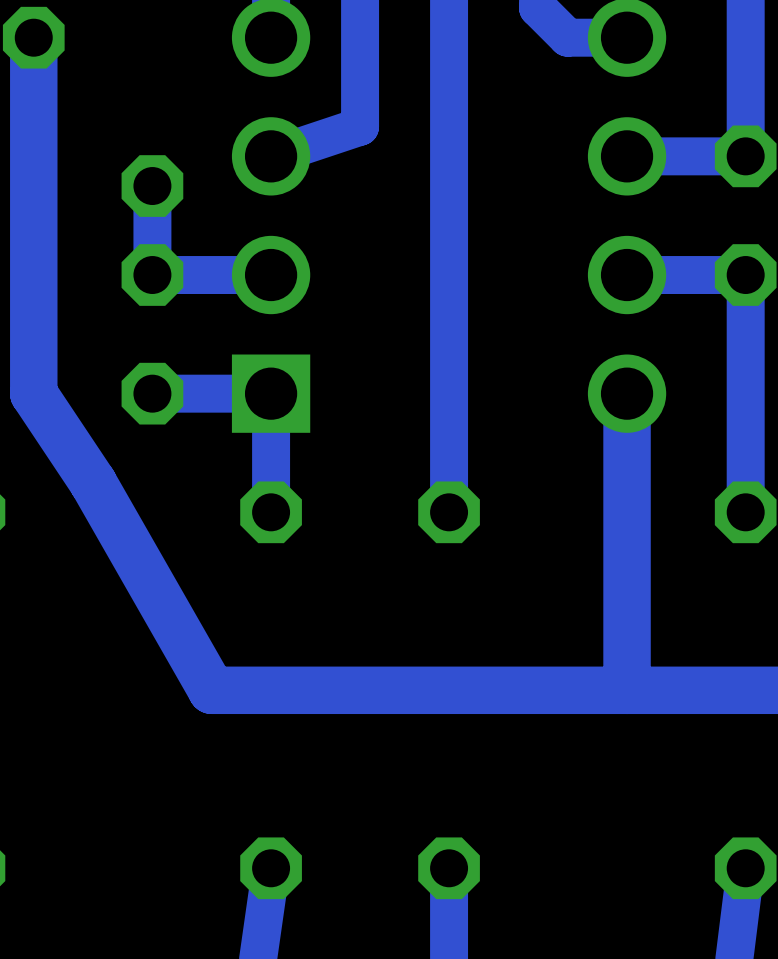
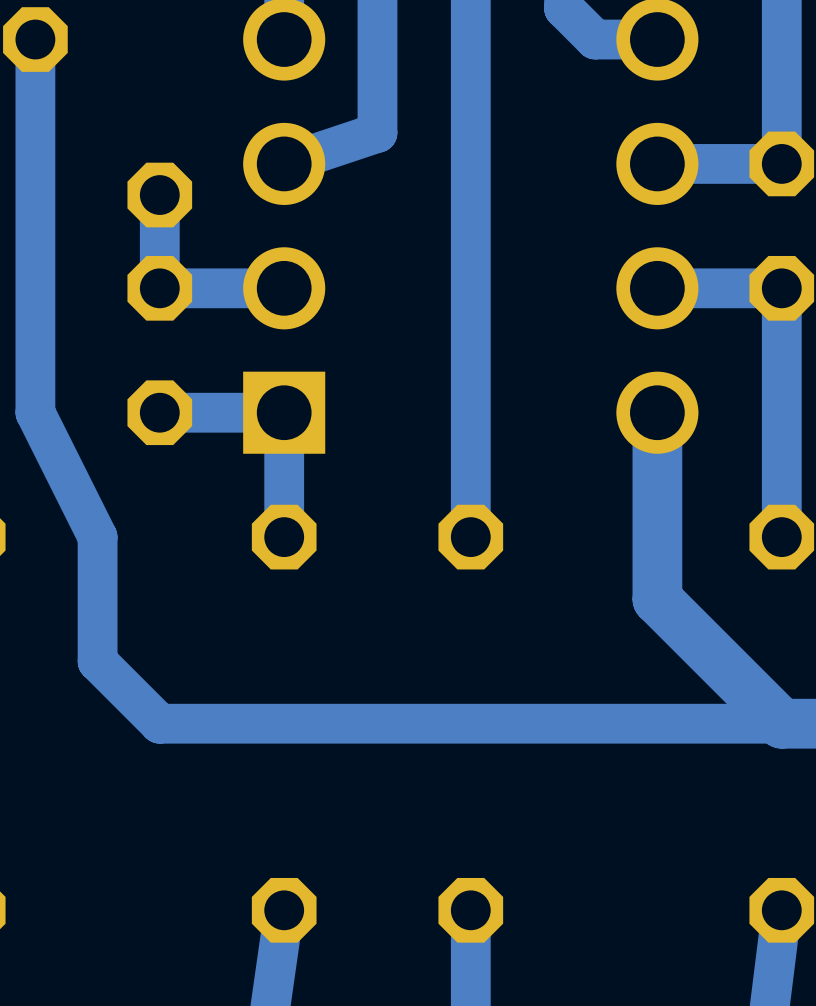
bottom track width: thick (33, 37) (33, 393) -> thin (35, 39) (35, 412)
bottom track: (33, 393) (93, 482) (211, 690) -> (35, 412) (97, 537) (97, 661) (159, 723) (222, 723)
bottom track: (627, 571) (627, 690) -> (657, 599) (781, 723)
bottom track width: thick (745, 690) (211, 690) -> thin (781, 723) (222, 723)

